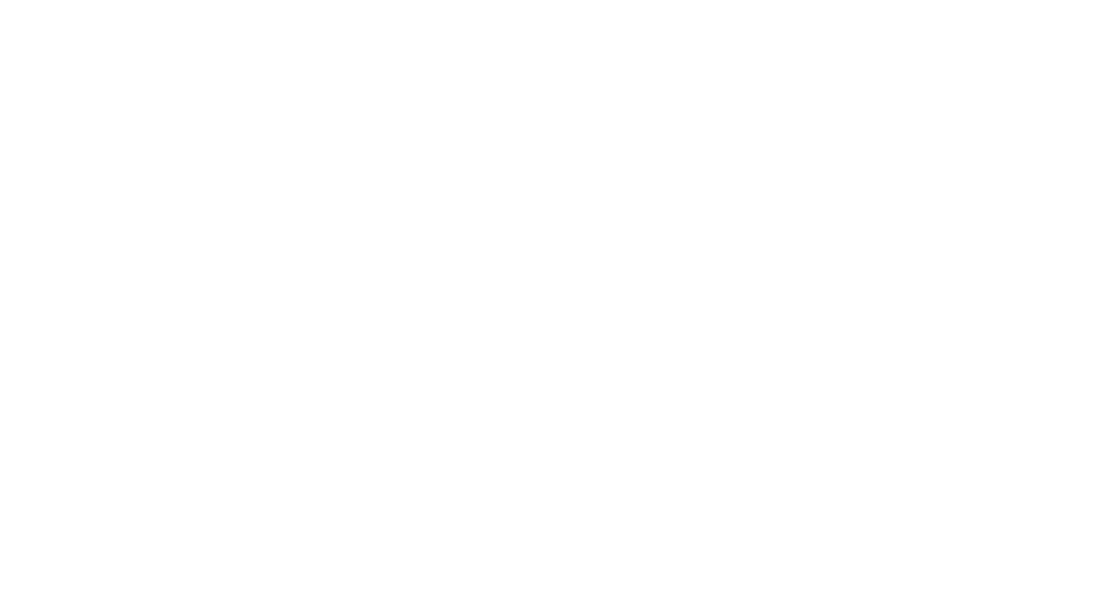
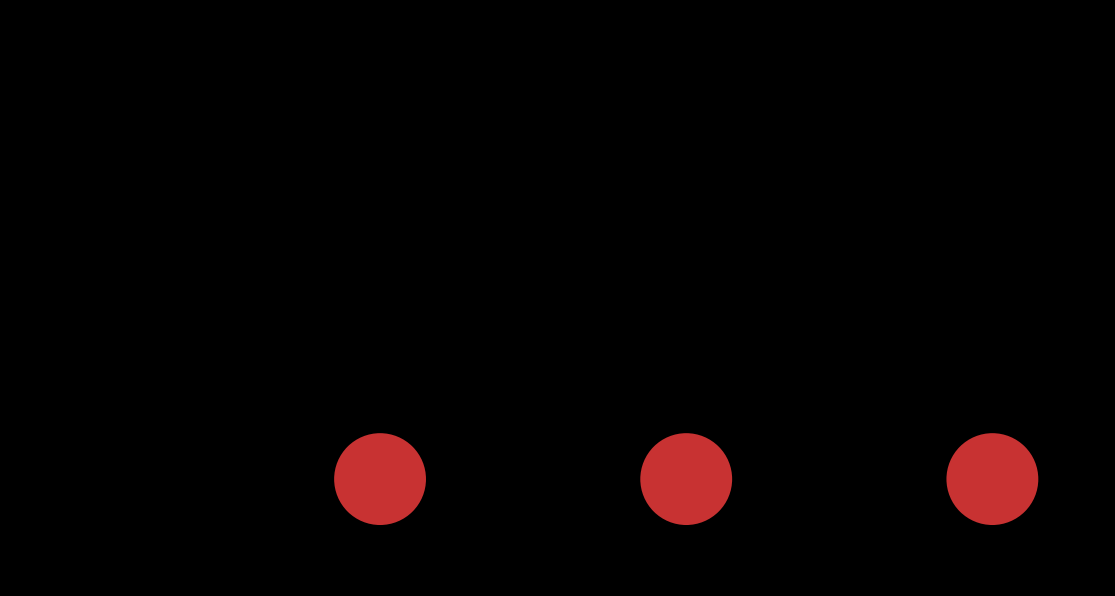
part: none -> (380, 479)
part: none -> (686, 479)
part: none -> (992, 479)

